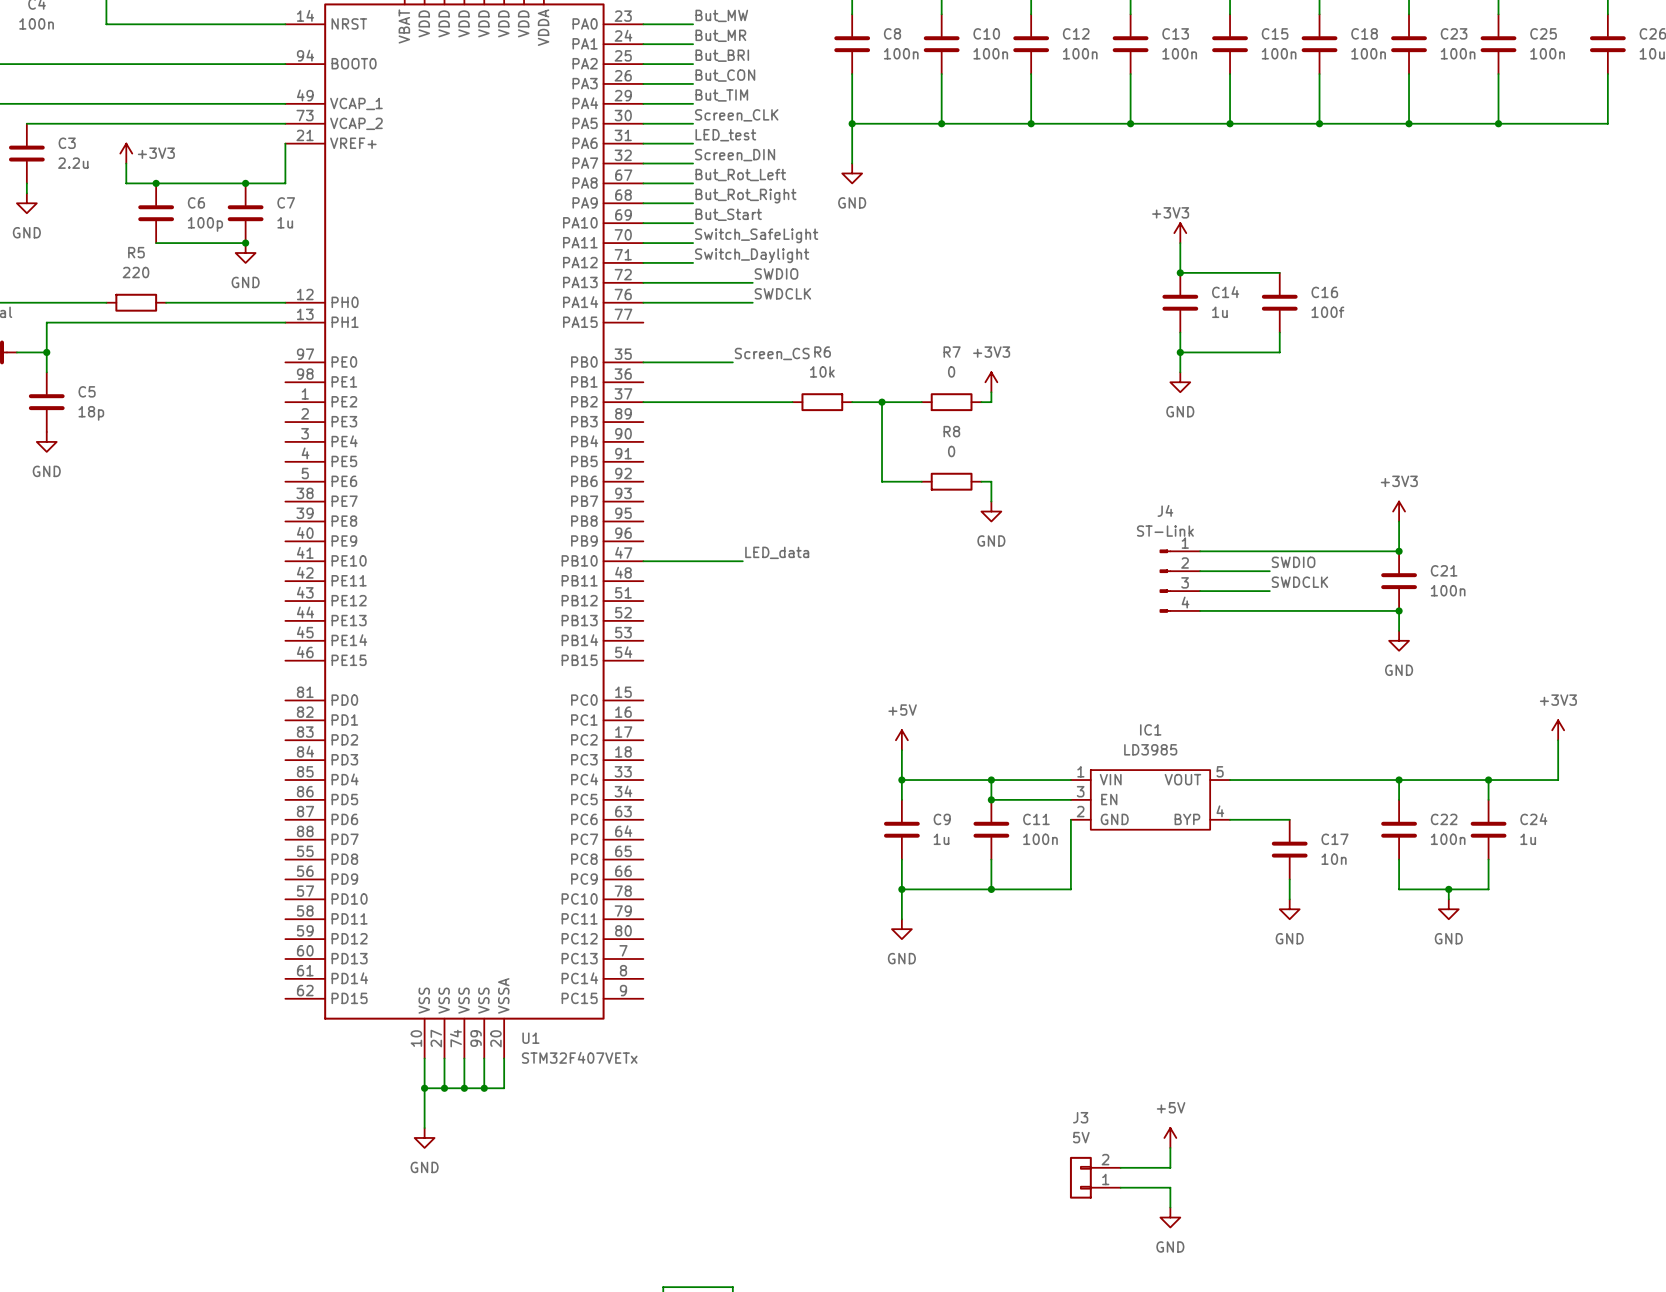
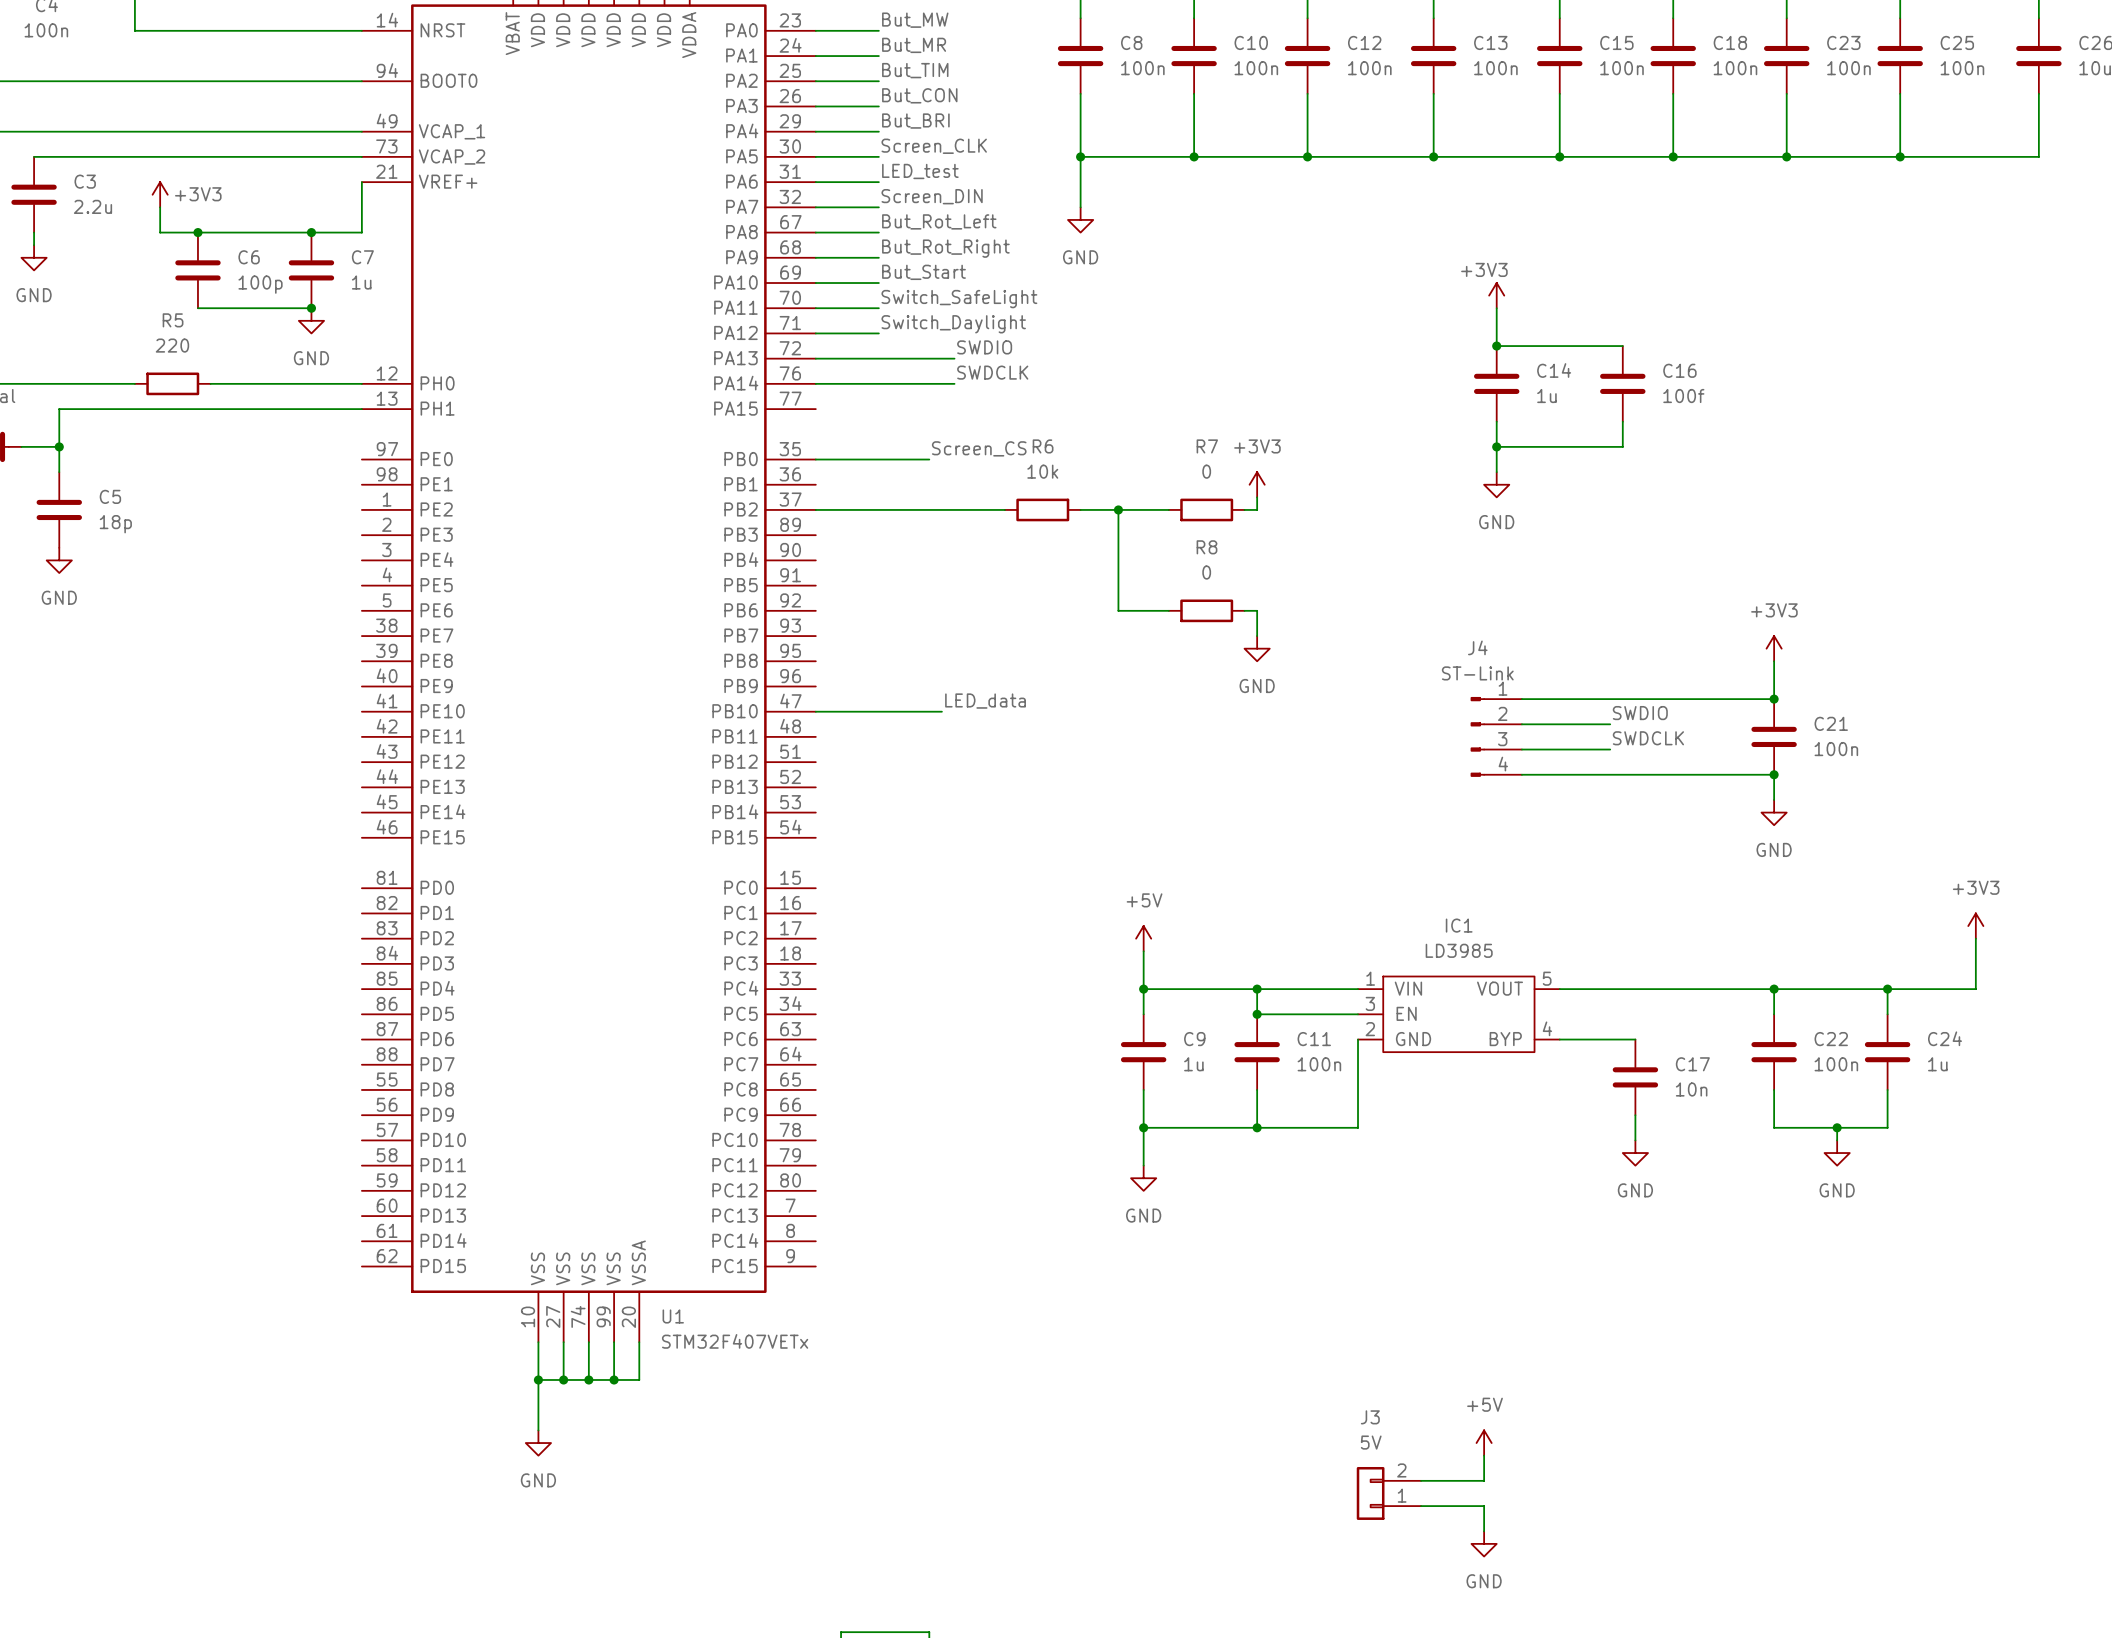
label: But_BRI (722, 55) -> But_TIM (915, 70)
label: But_TIM (721, 95) -> But_BRI (915, 121)

